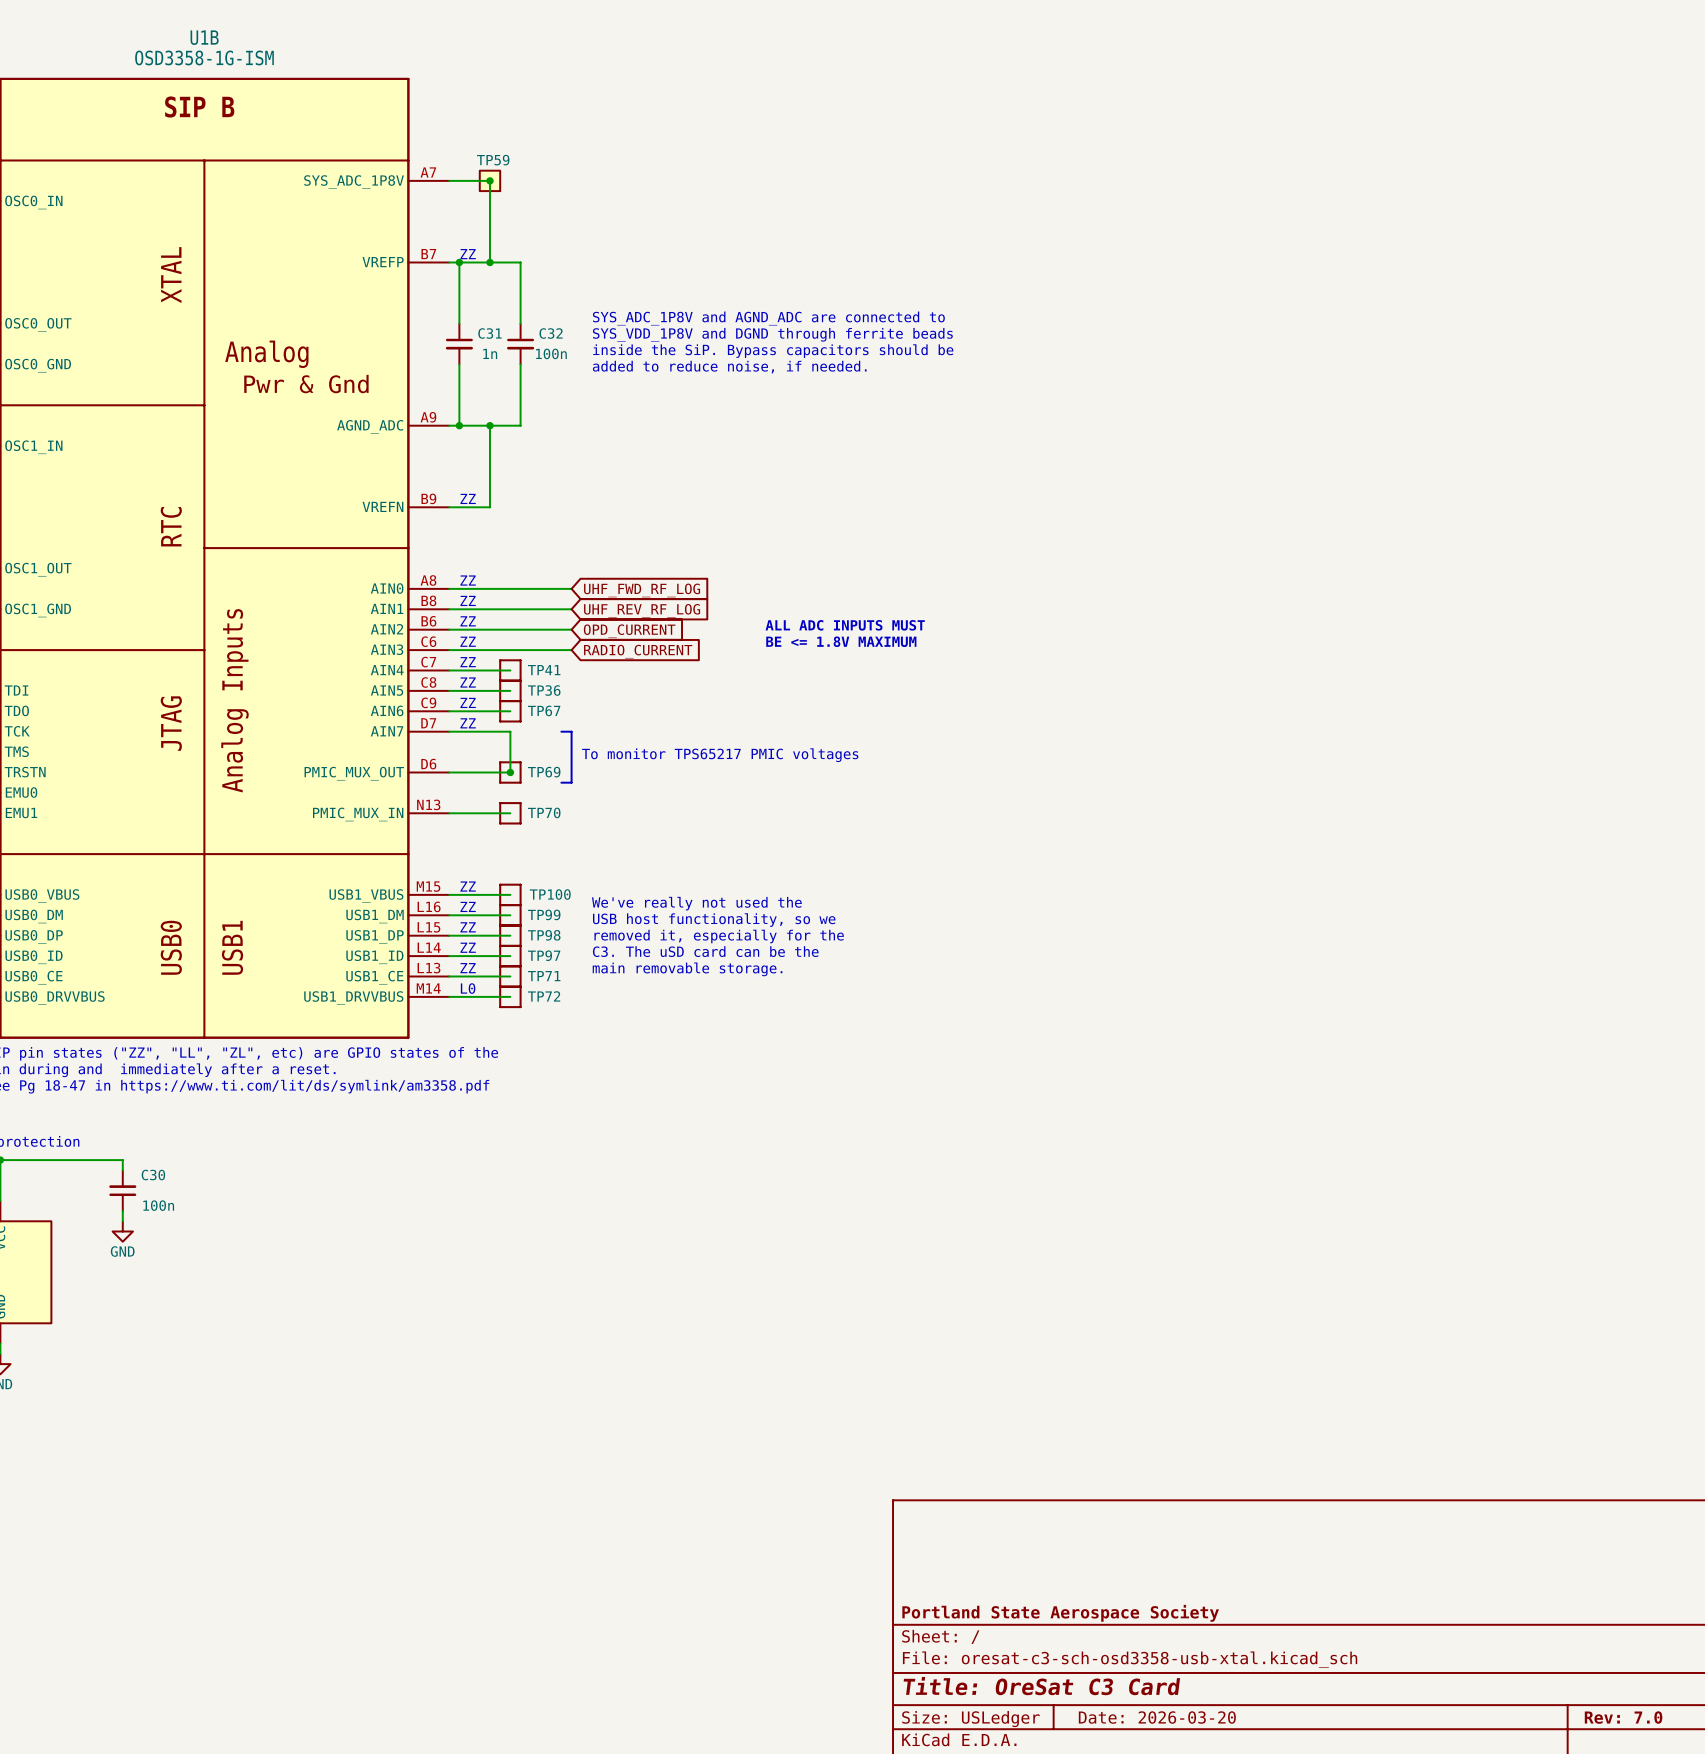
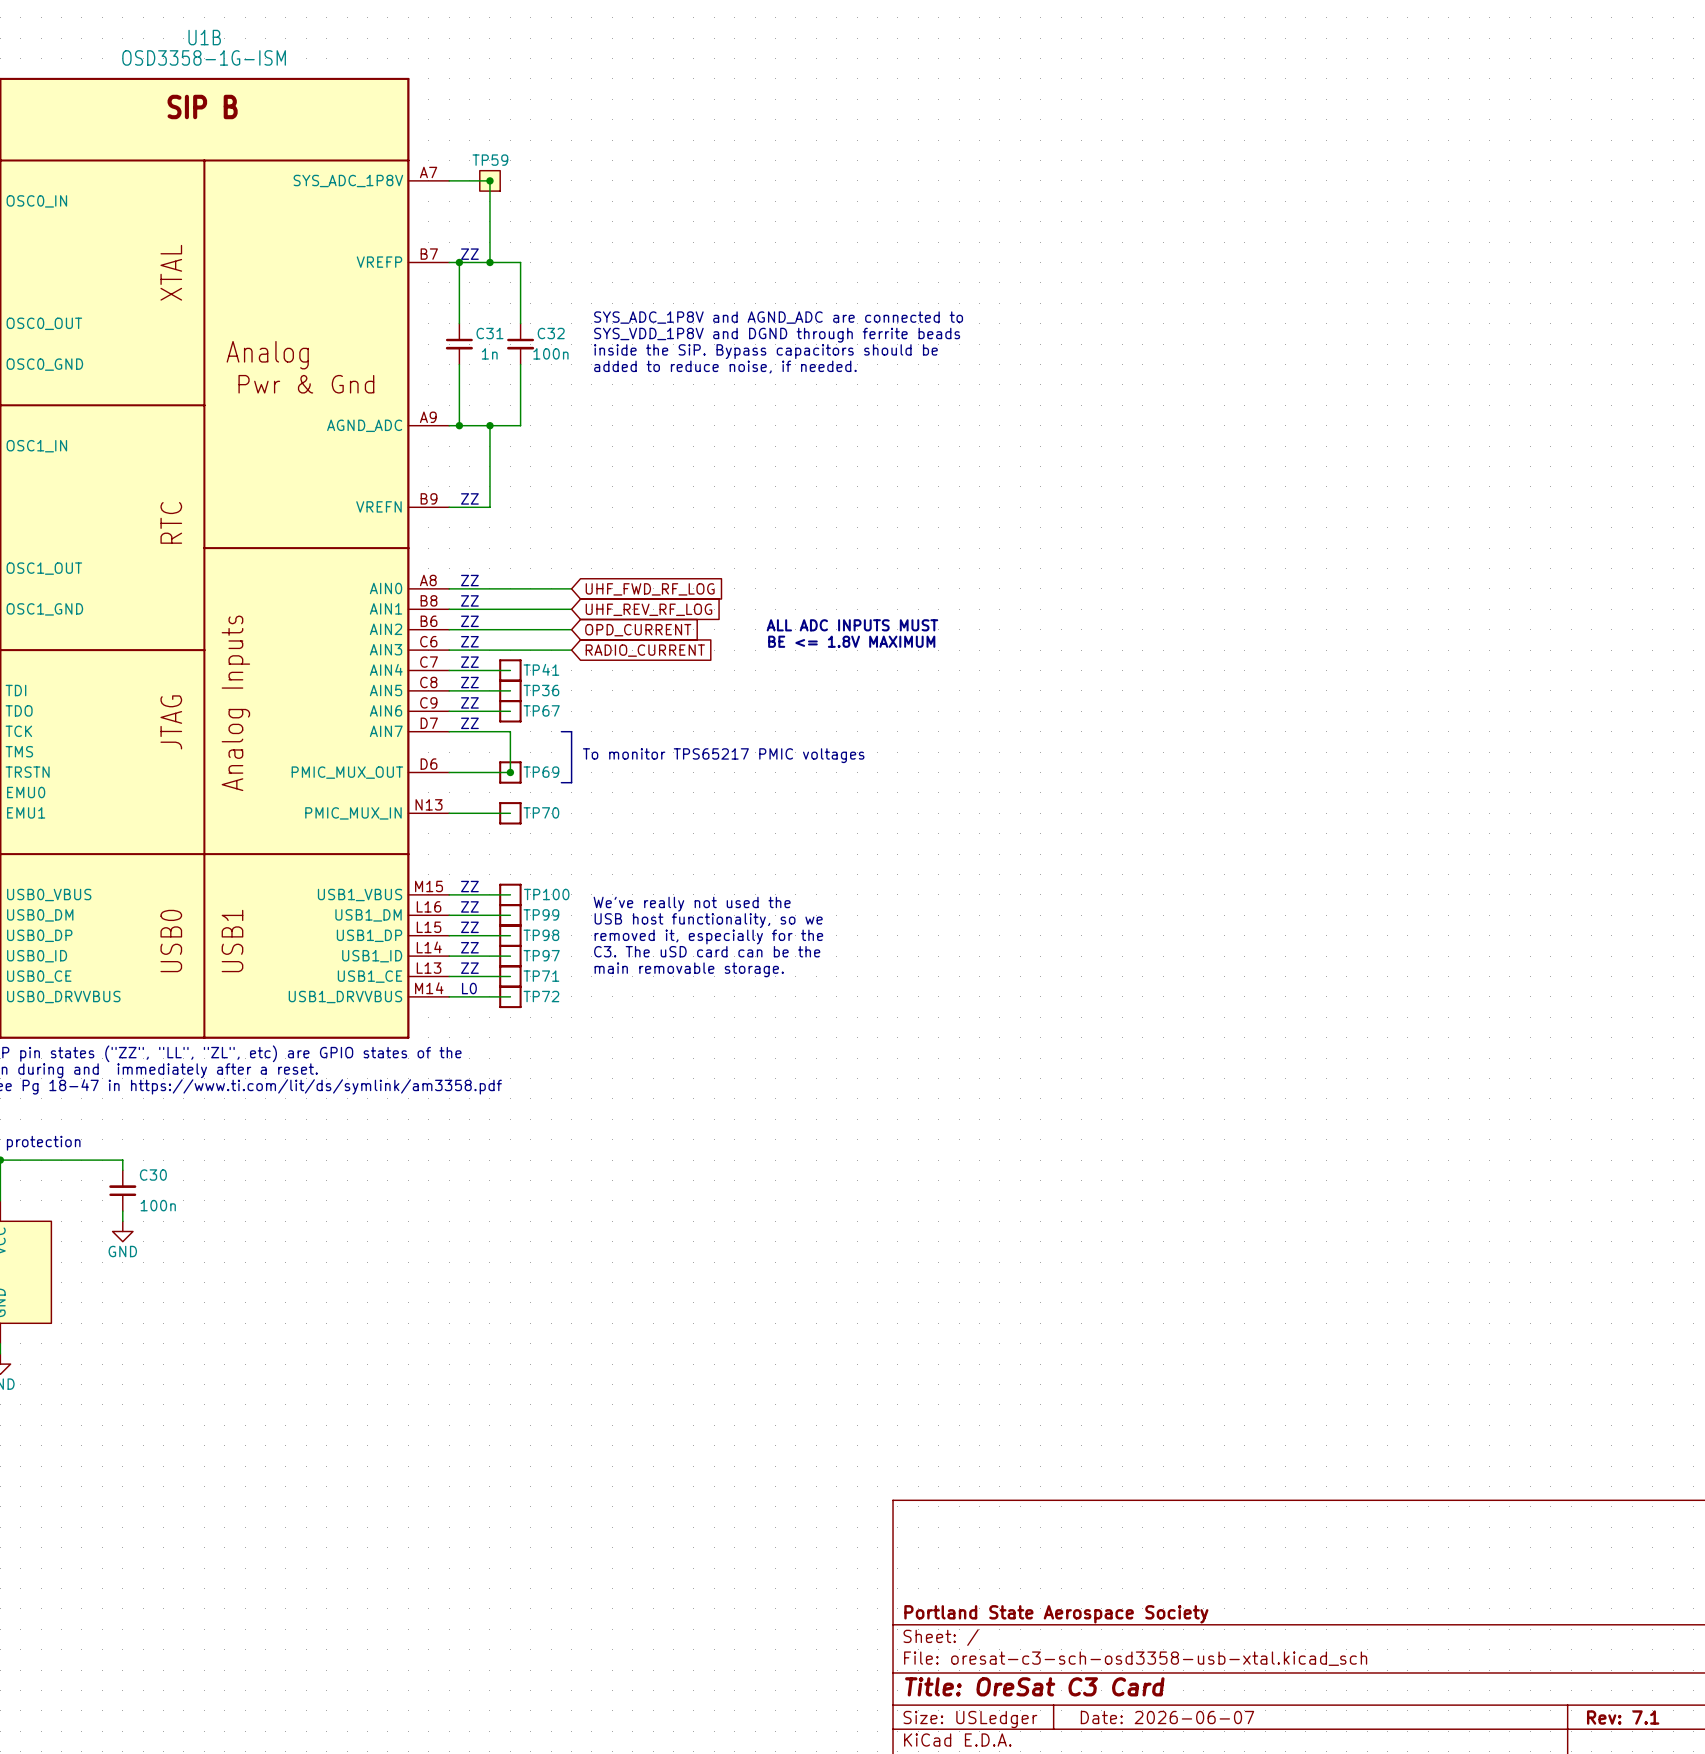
title block: Date: 2026-03-20 (1157, 1717) -> Date: 2026-06-07 (1167, 1717)
title block: Rev: 7.0 (1623, 1717) -> Rev: 7.1 (1623, 1717)

